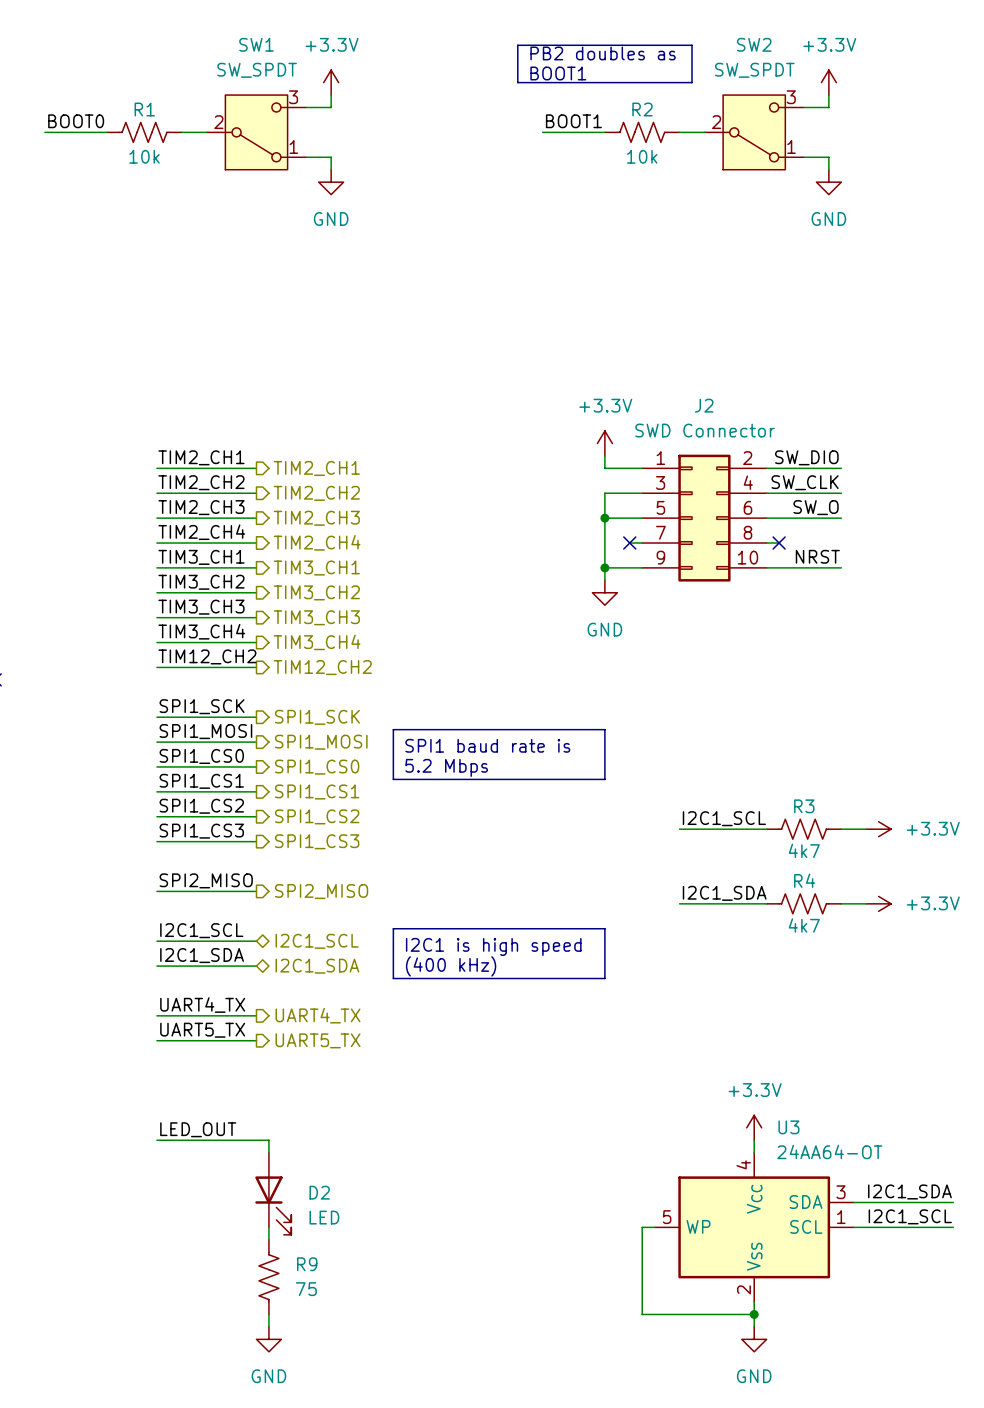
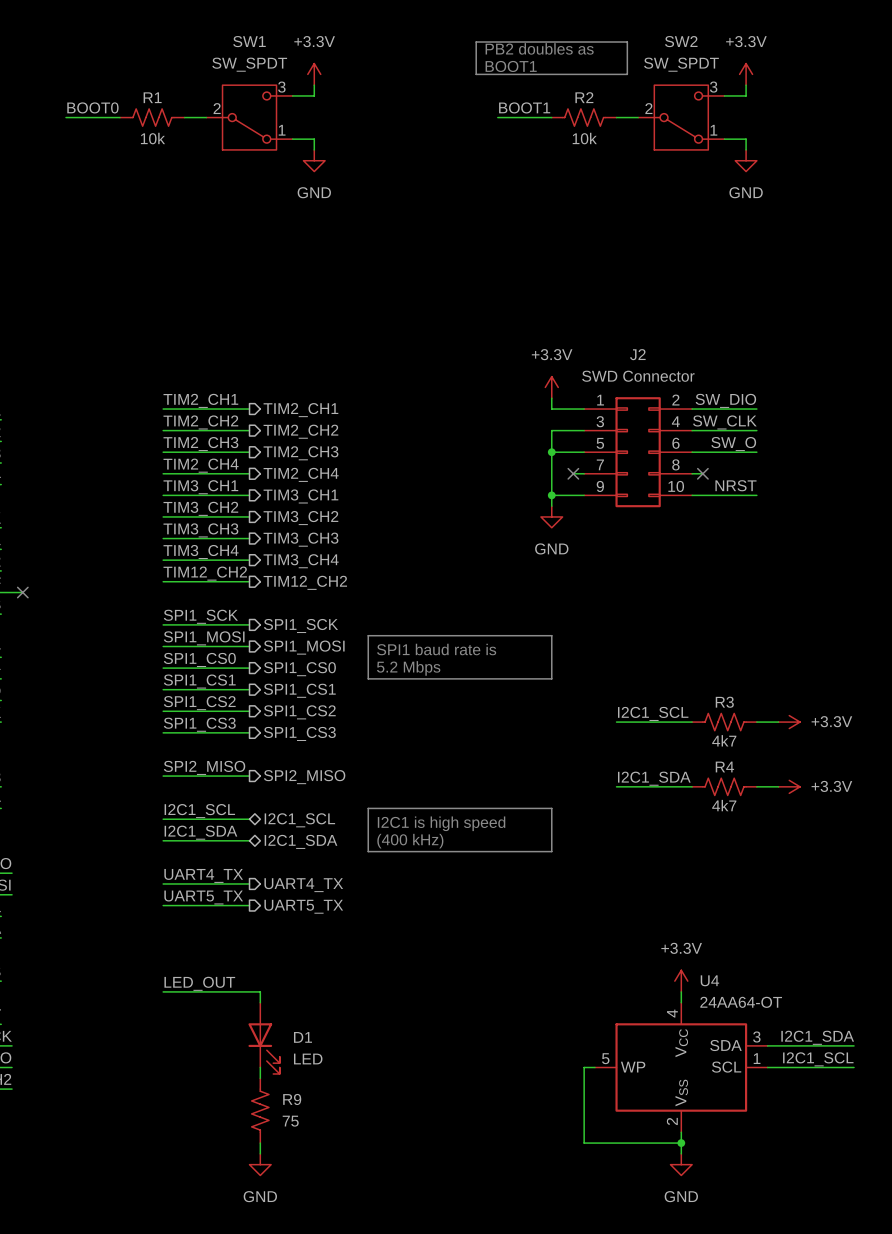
U3 name: U3 (788, 1127) -> U4 (709, 980)
D2 name: D2 (319, 1192) -> D1 (302, 1037)

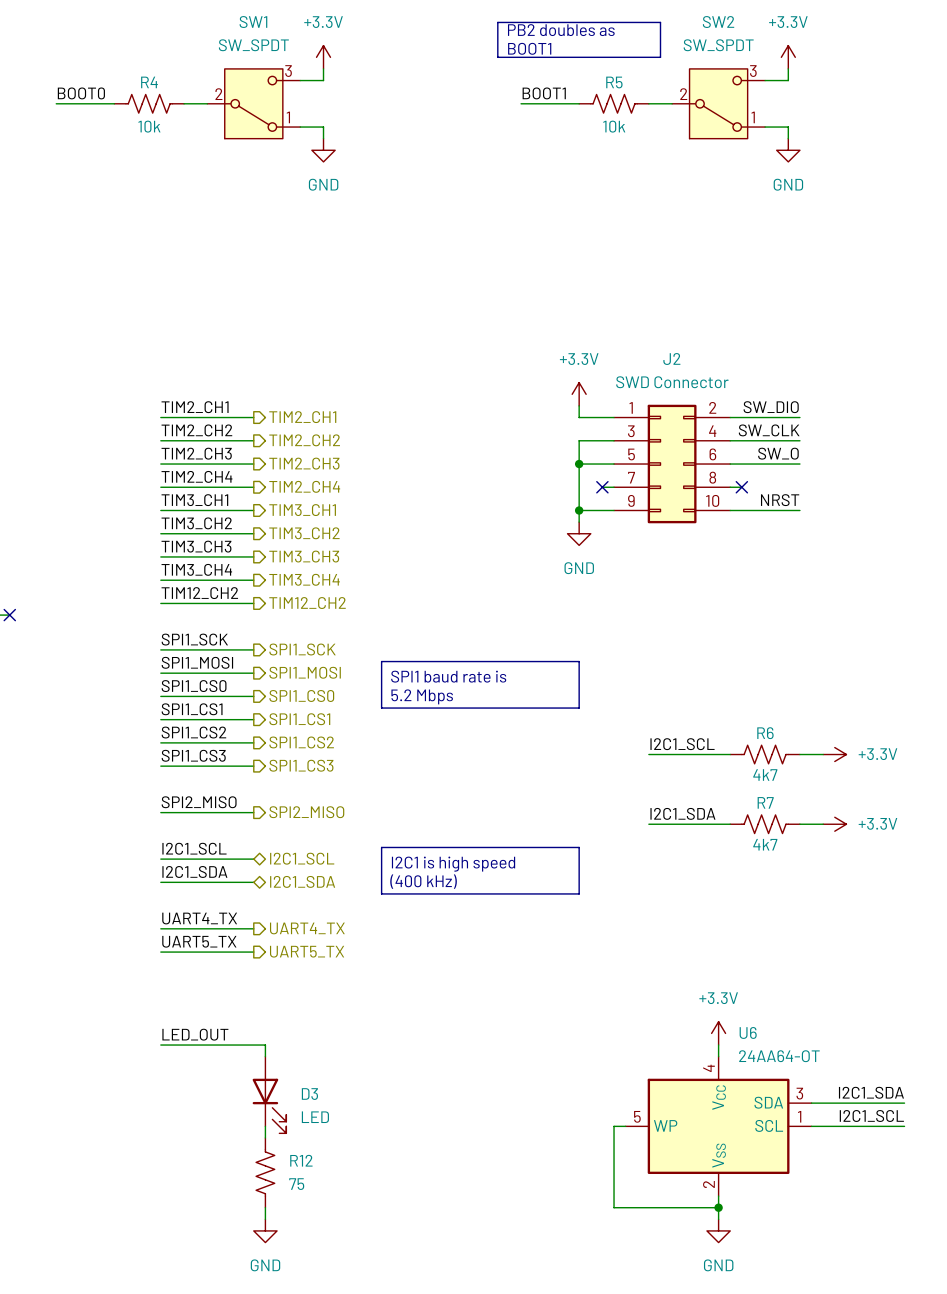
R1 name: R1 (152, 97) -> R4 (149, 82)
R2 name: R2 (584, 97) -> R5 (614, 82)
R3 name: R3 (724, 702) -> R6 (765, 733)
R4 name: R4 (724, 767) -> R7 (765, 802)
U4 name: U4 (709, 980) -> U6 (748, 1032)
D1 name: D1 (302, 1037) -> D3 (309, 1094)
R9 name: R9 (292, 1099) -> R12 (301, 1160)

